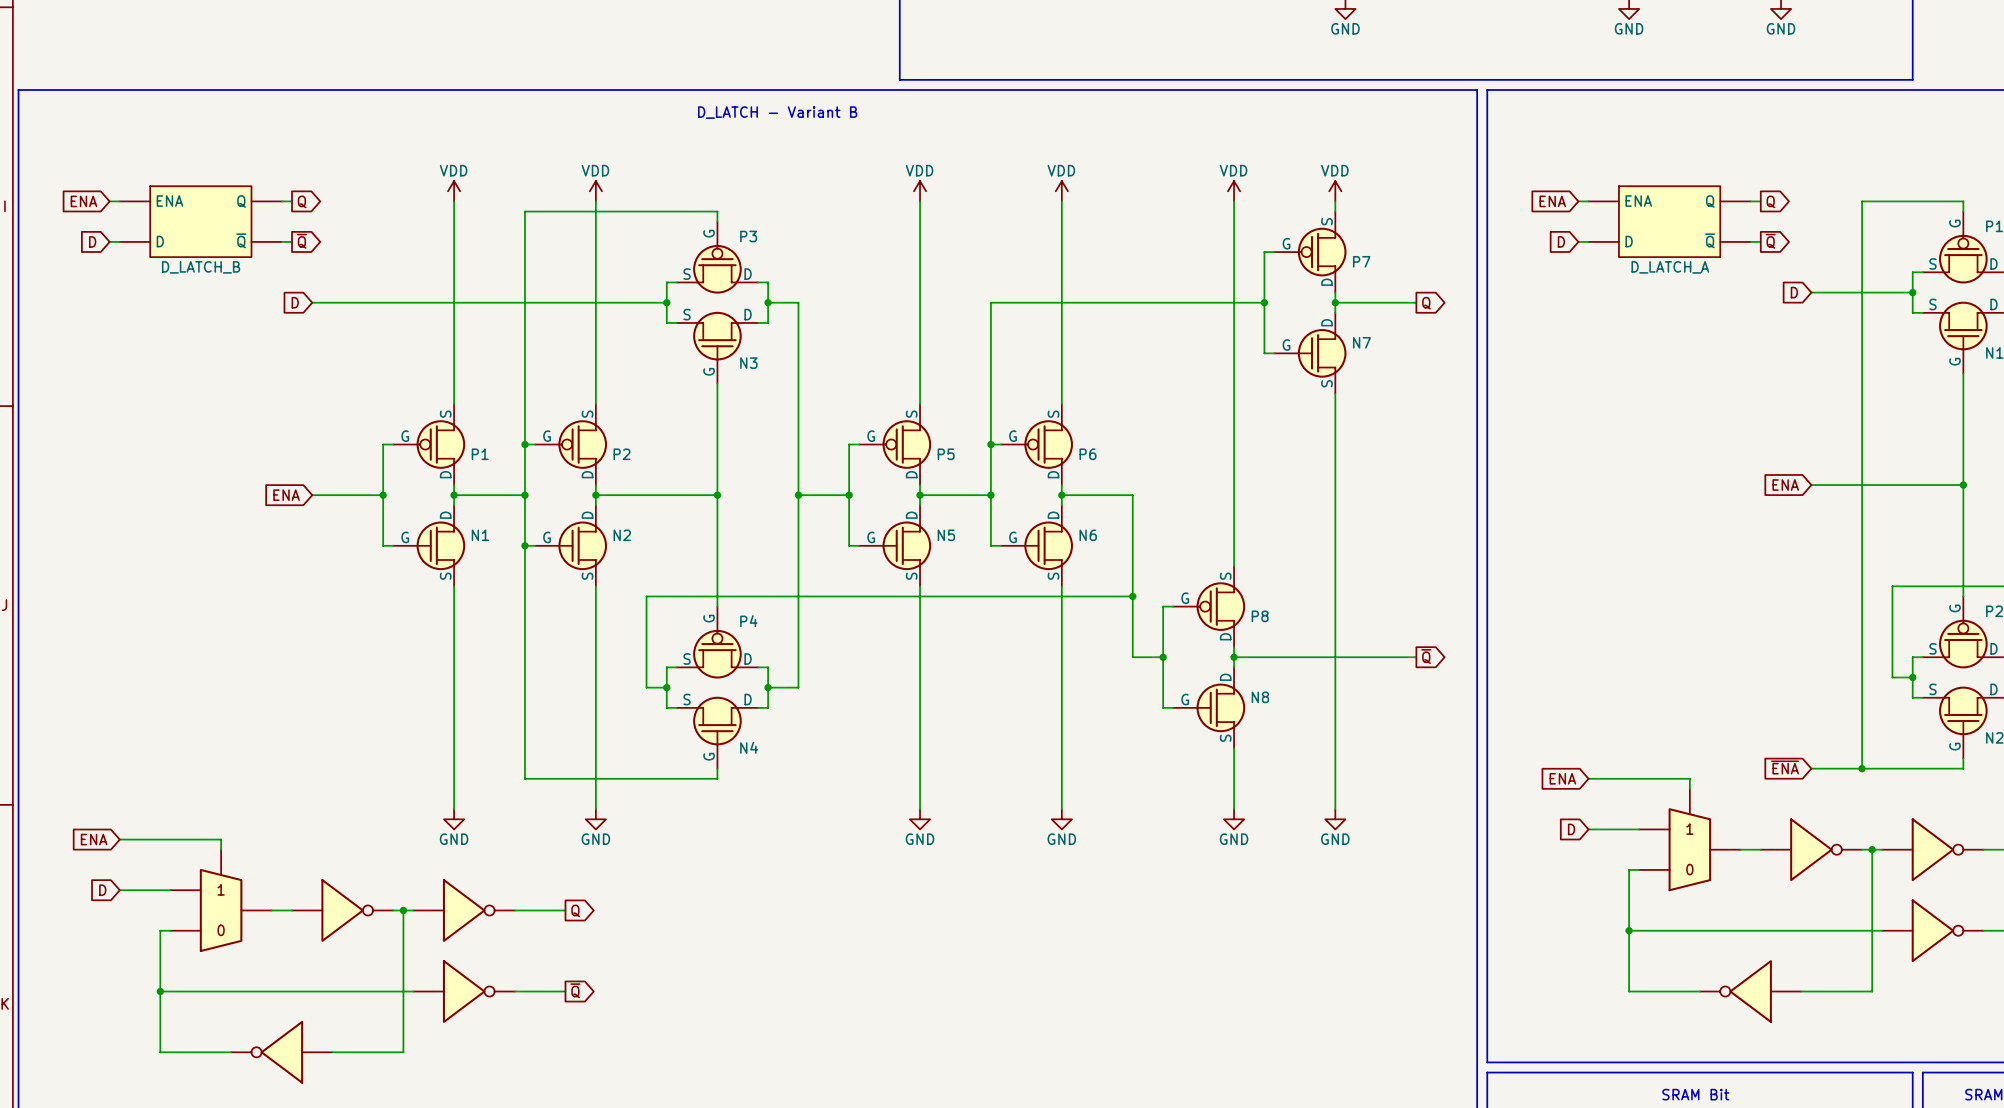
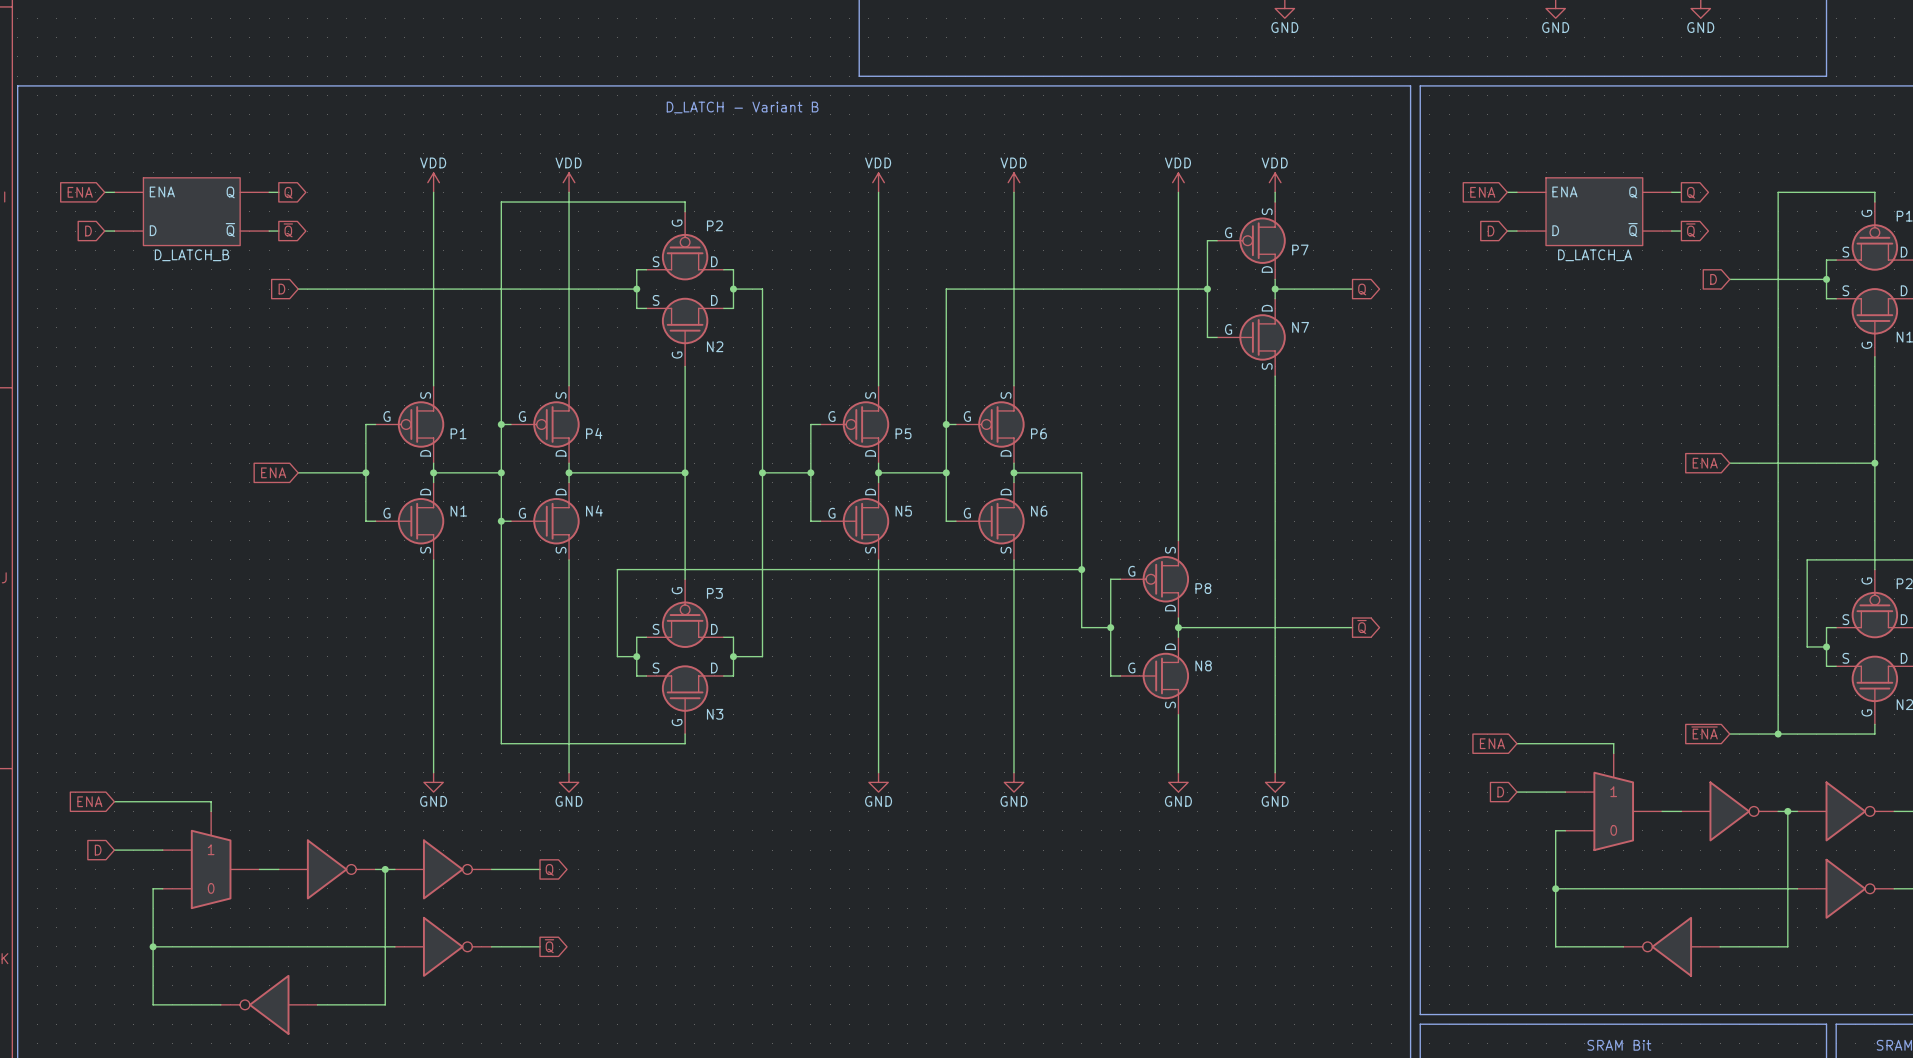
P3 name: P3 (748, 236) -> P2 (714, 225)
N3 name: N3 (748, 363) -> N2 (715, 346)
P2 name: P2 (622, 454) -> P4 (594, 433)
N2 name: N2 (622, 535) -> N4 (594, 510)
P4 name: P4 (748, 621) -> P3 (714, 593)
N4 name: N4 (749, 747) -> N3 (715, 714)

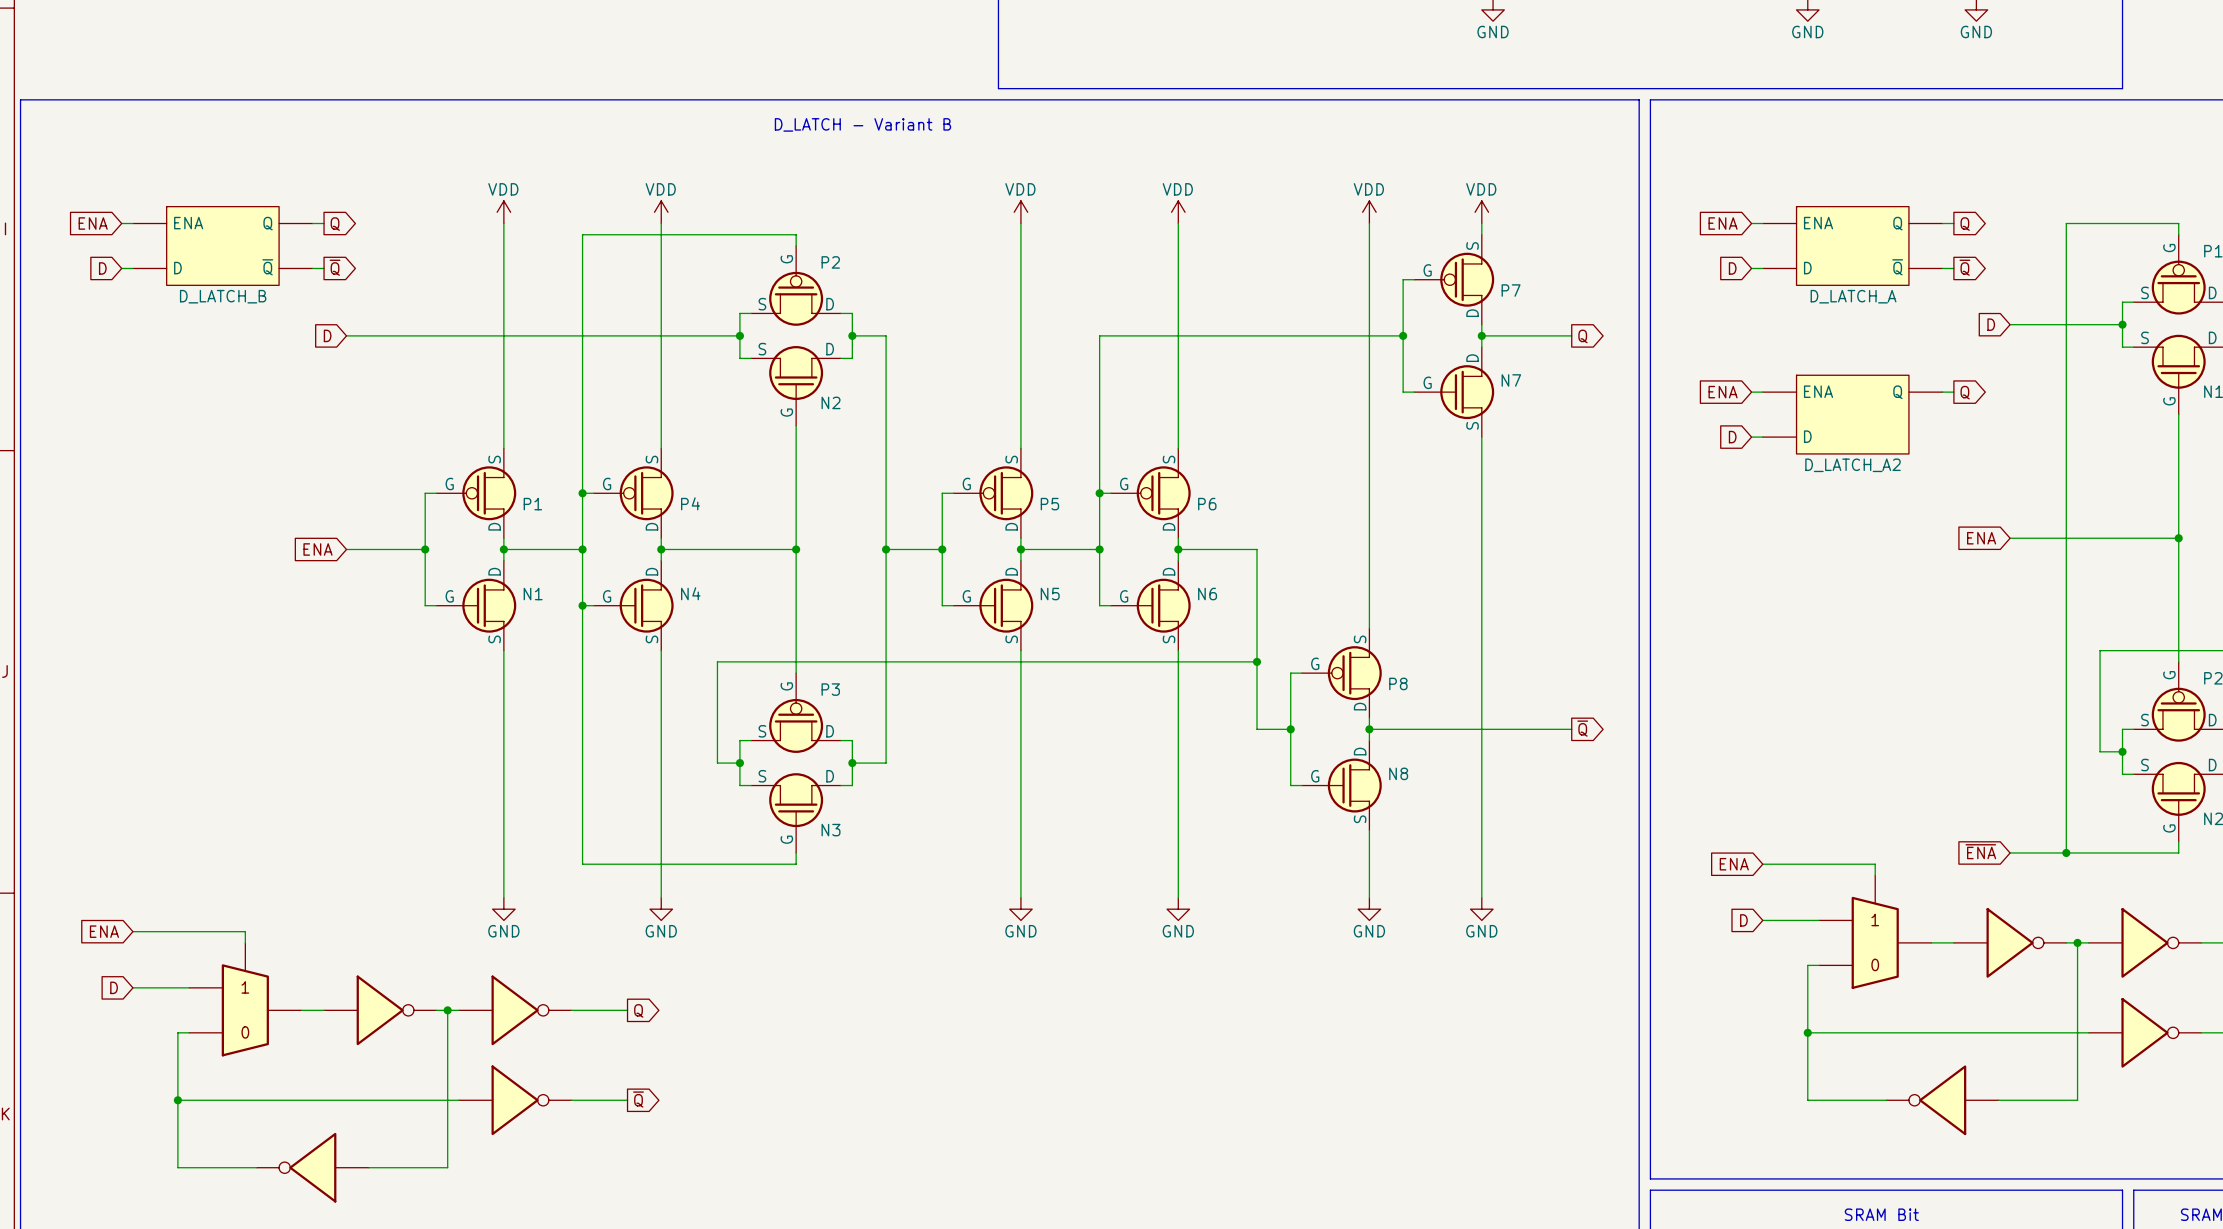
global label: none -> ENA (1723, 392)
wire: none -> (1751, 392) (1762, 392)
wire: none -> (1942, 392) (1953, 392)
global label: none -> Q (1965, 392)
part: none -> D_LATCH_A2 (1852, 414)
global label: none -> D (1732, 437)
wire: none -> (1751, 437) (1762, 437)

